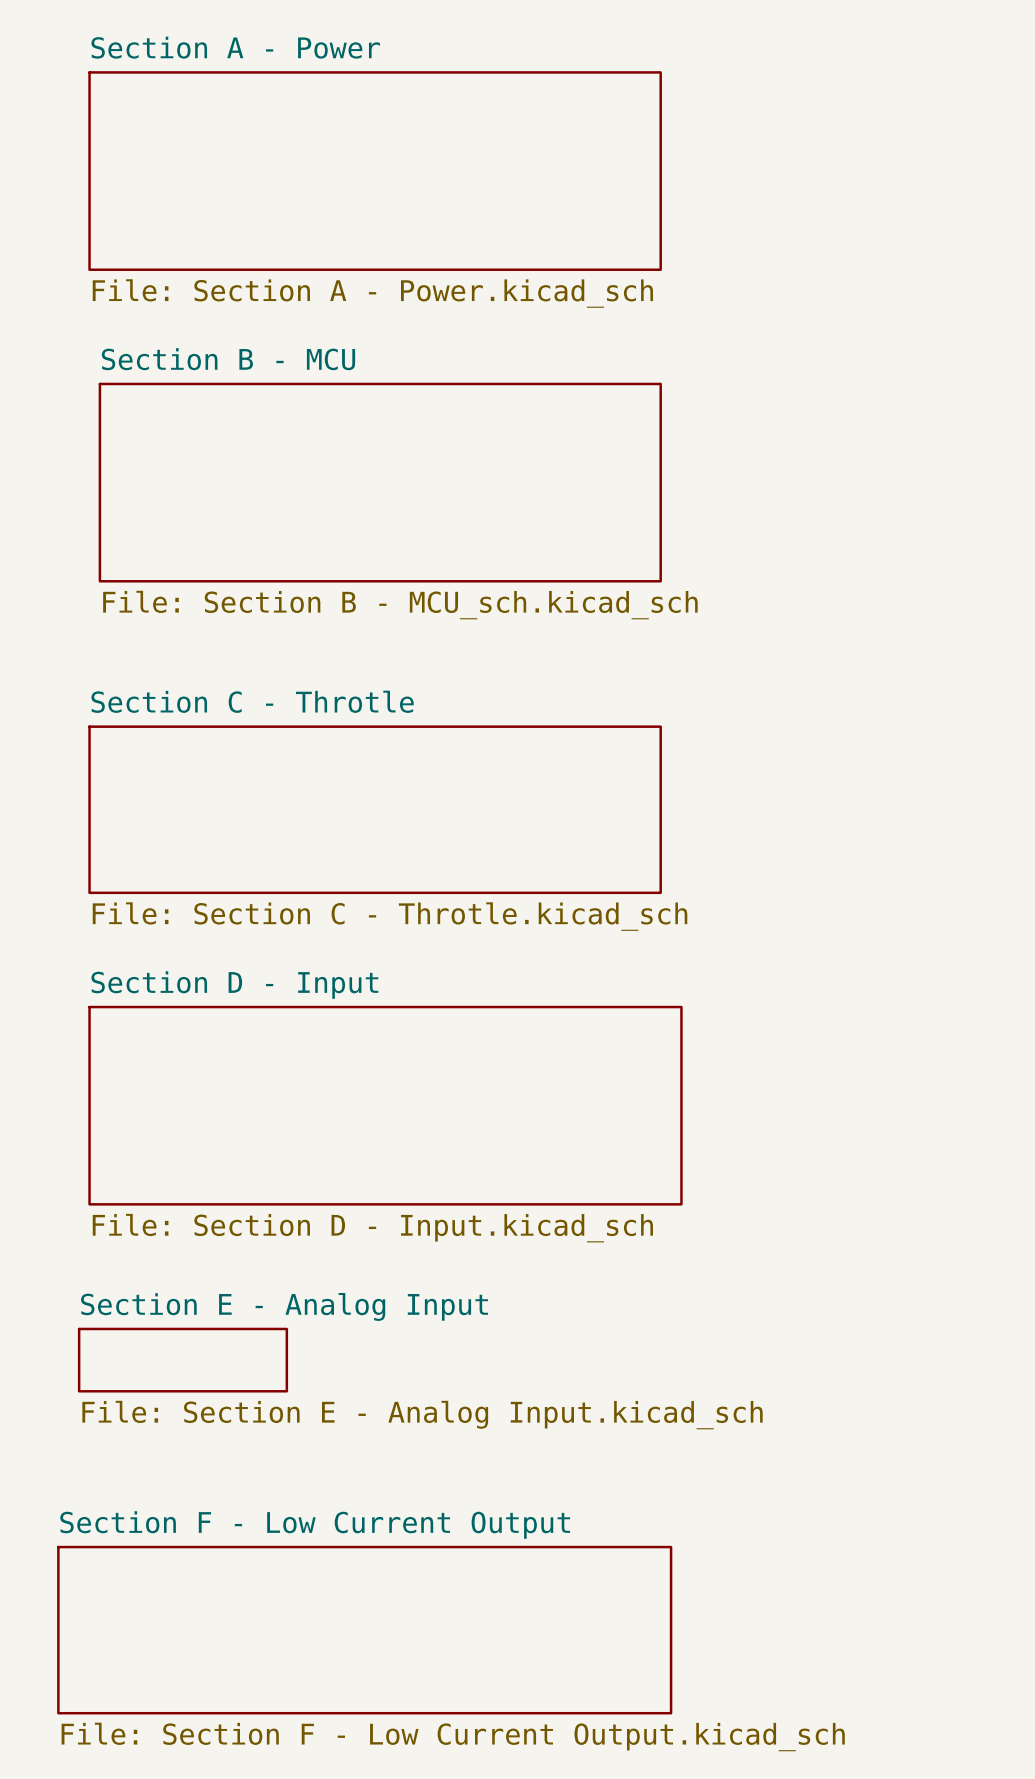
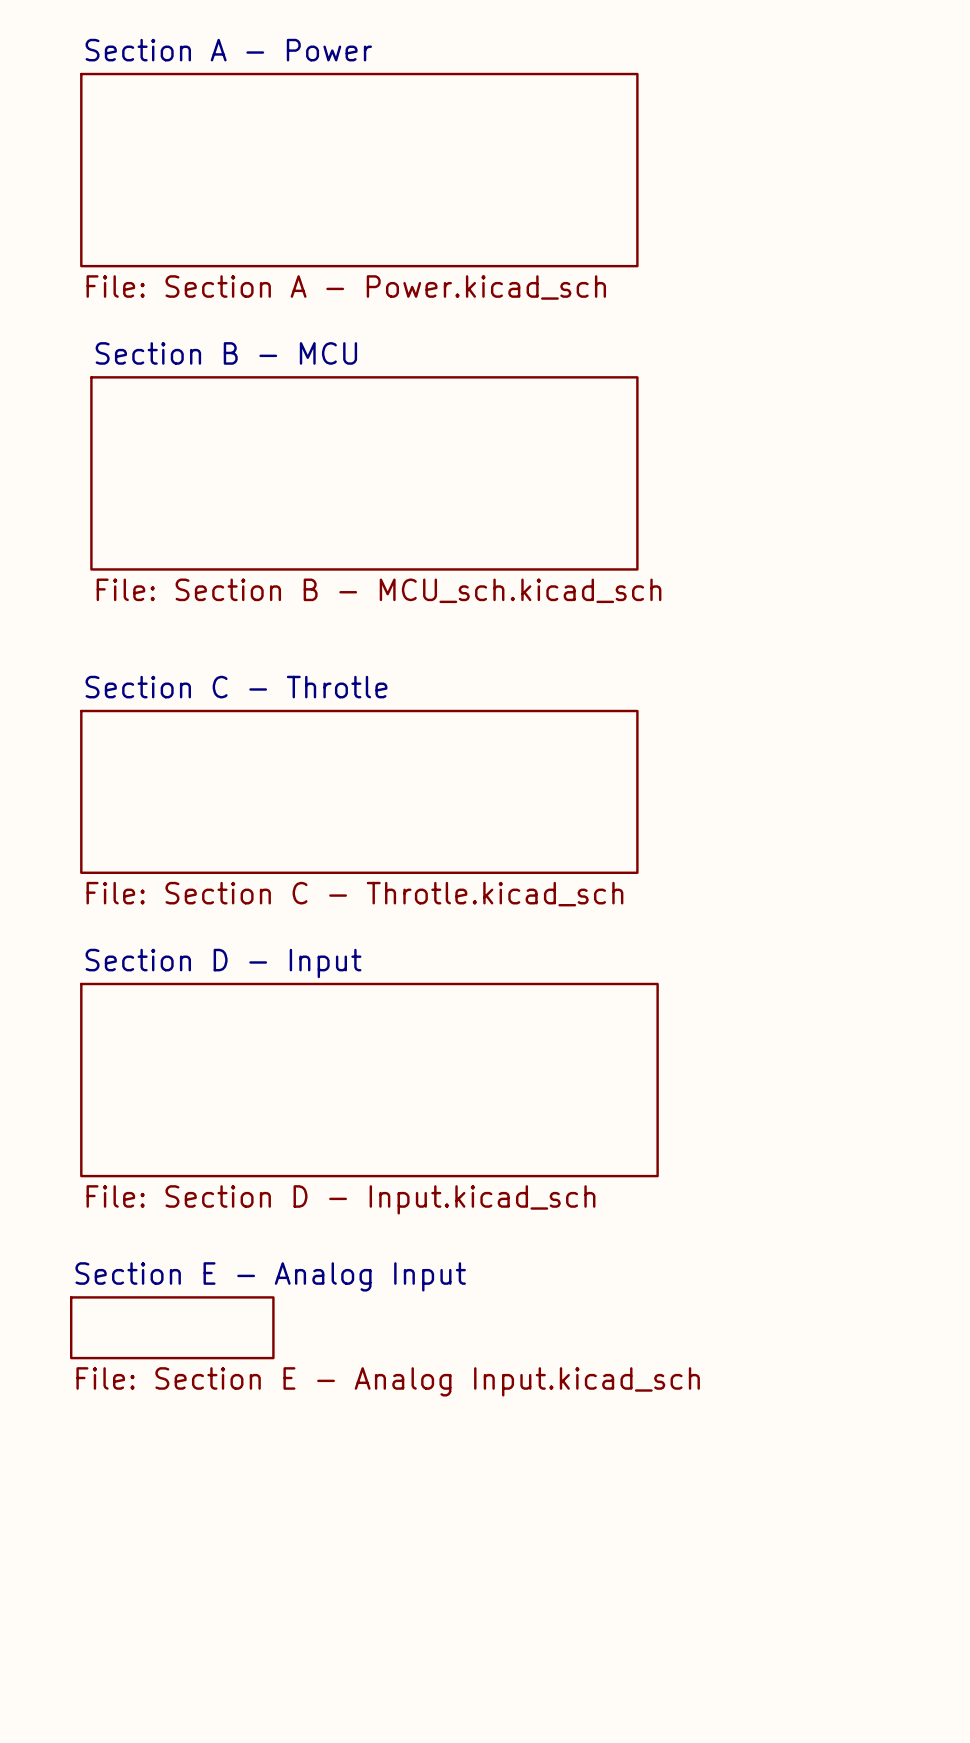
sheet Section F - Low Current Output: File: Section F - Low Current Output.kicad_sch (364, 1630) -> none

